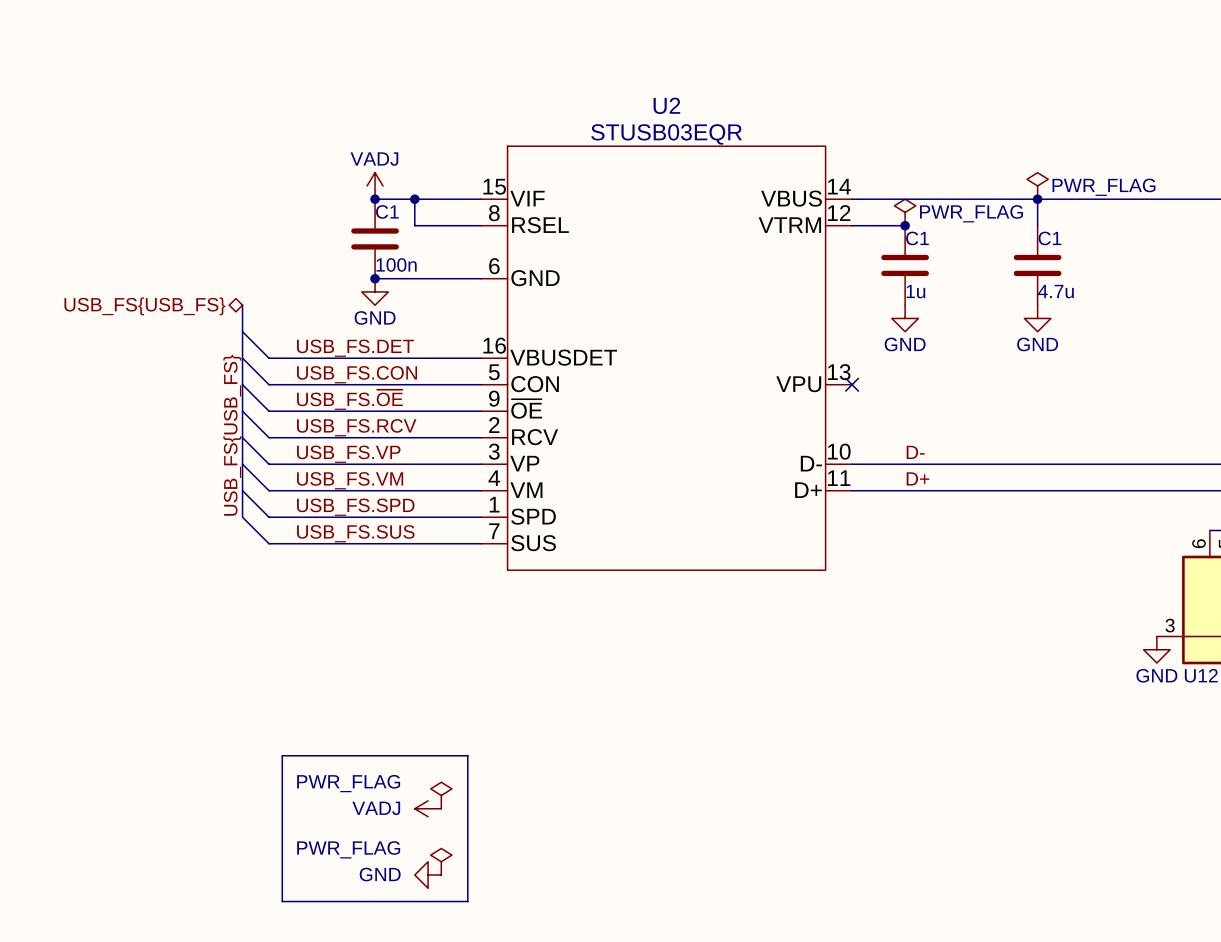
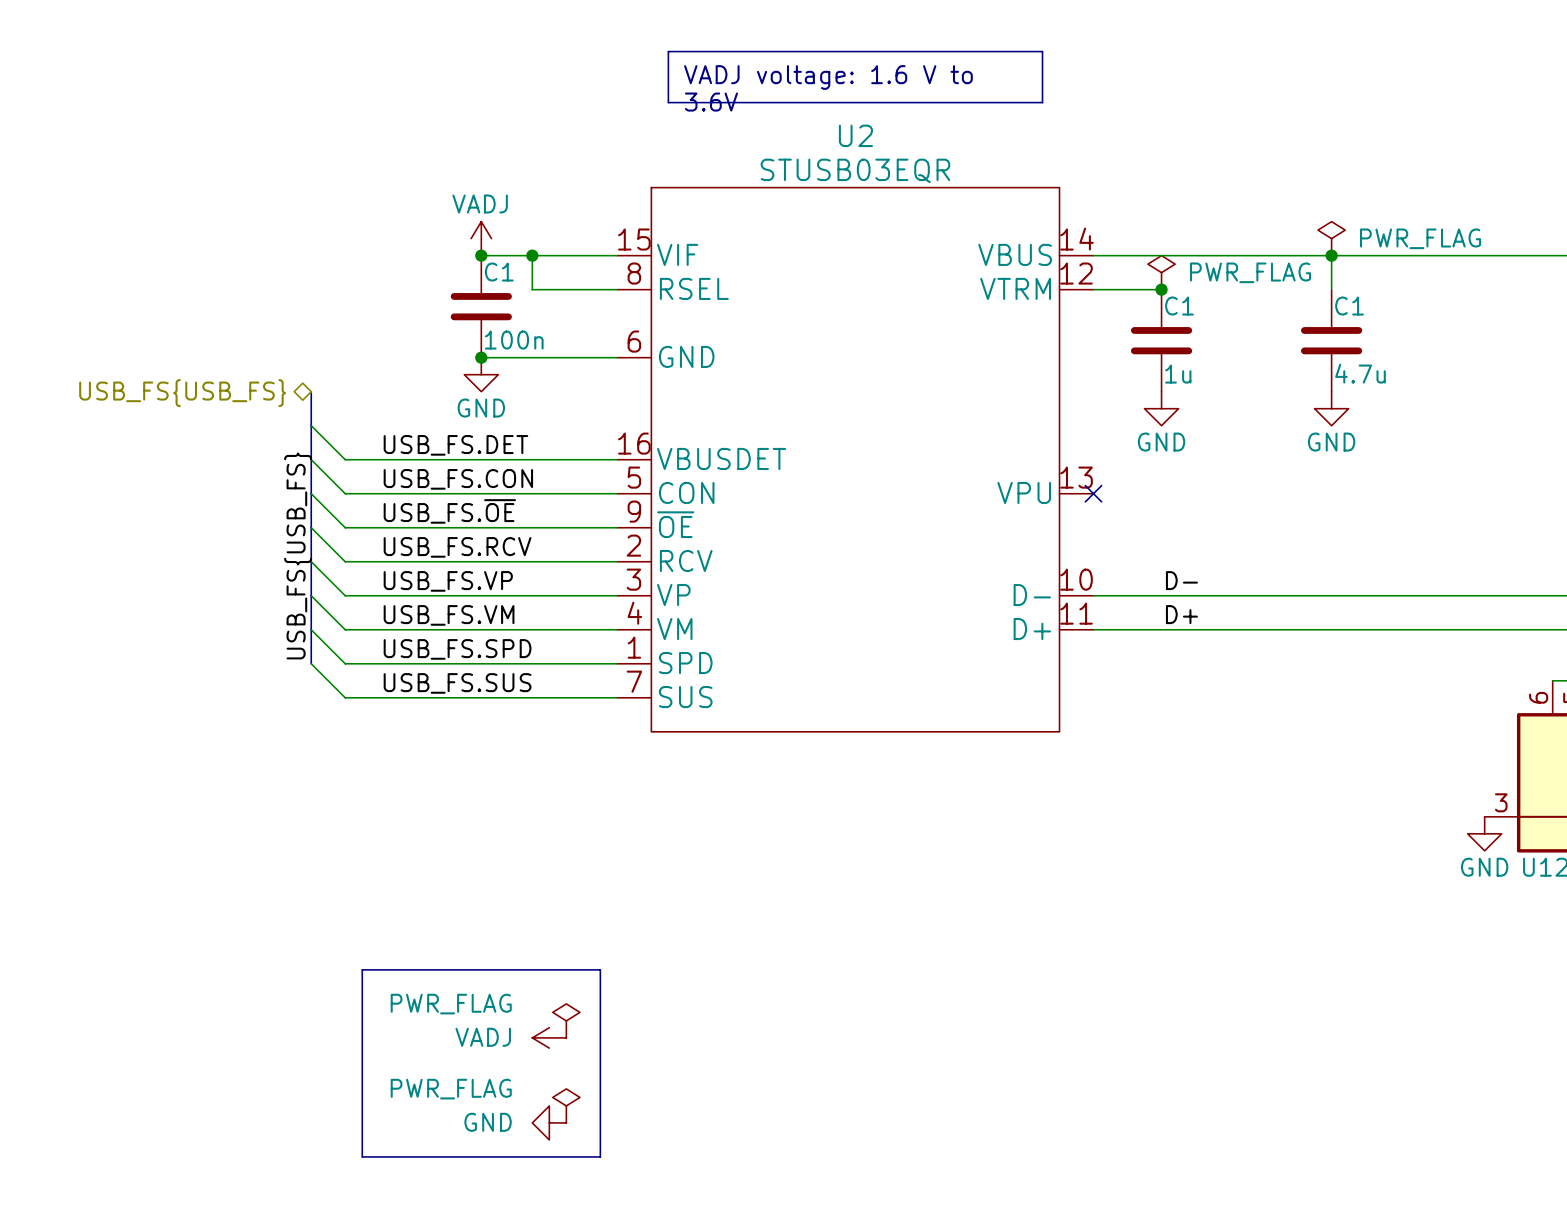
line: none -> (668, 51) (1042, 51) (1042, 102) (668, 102) (668, 51)
text: none -> VADJ voltage: 1.6 V to (828, 77)
text: none -> 3.6V (711, 102)

